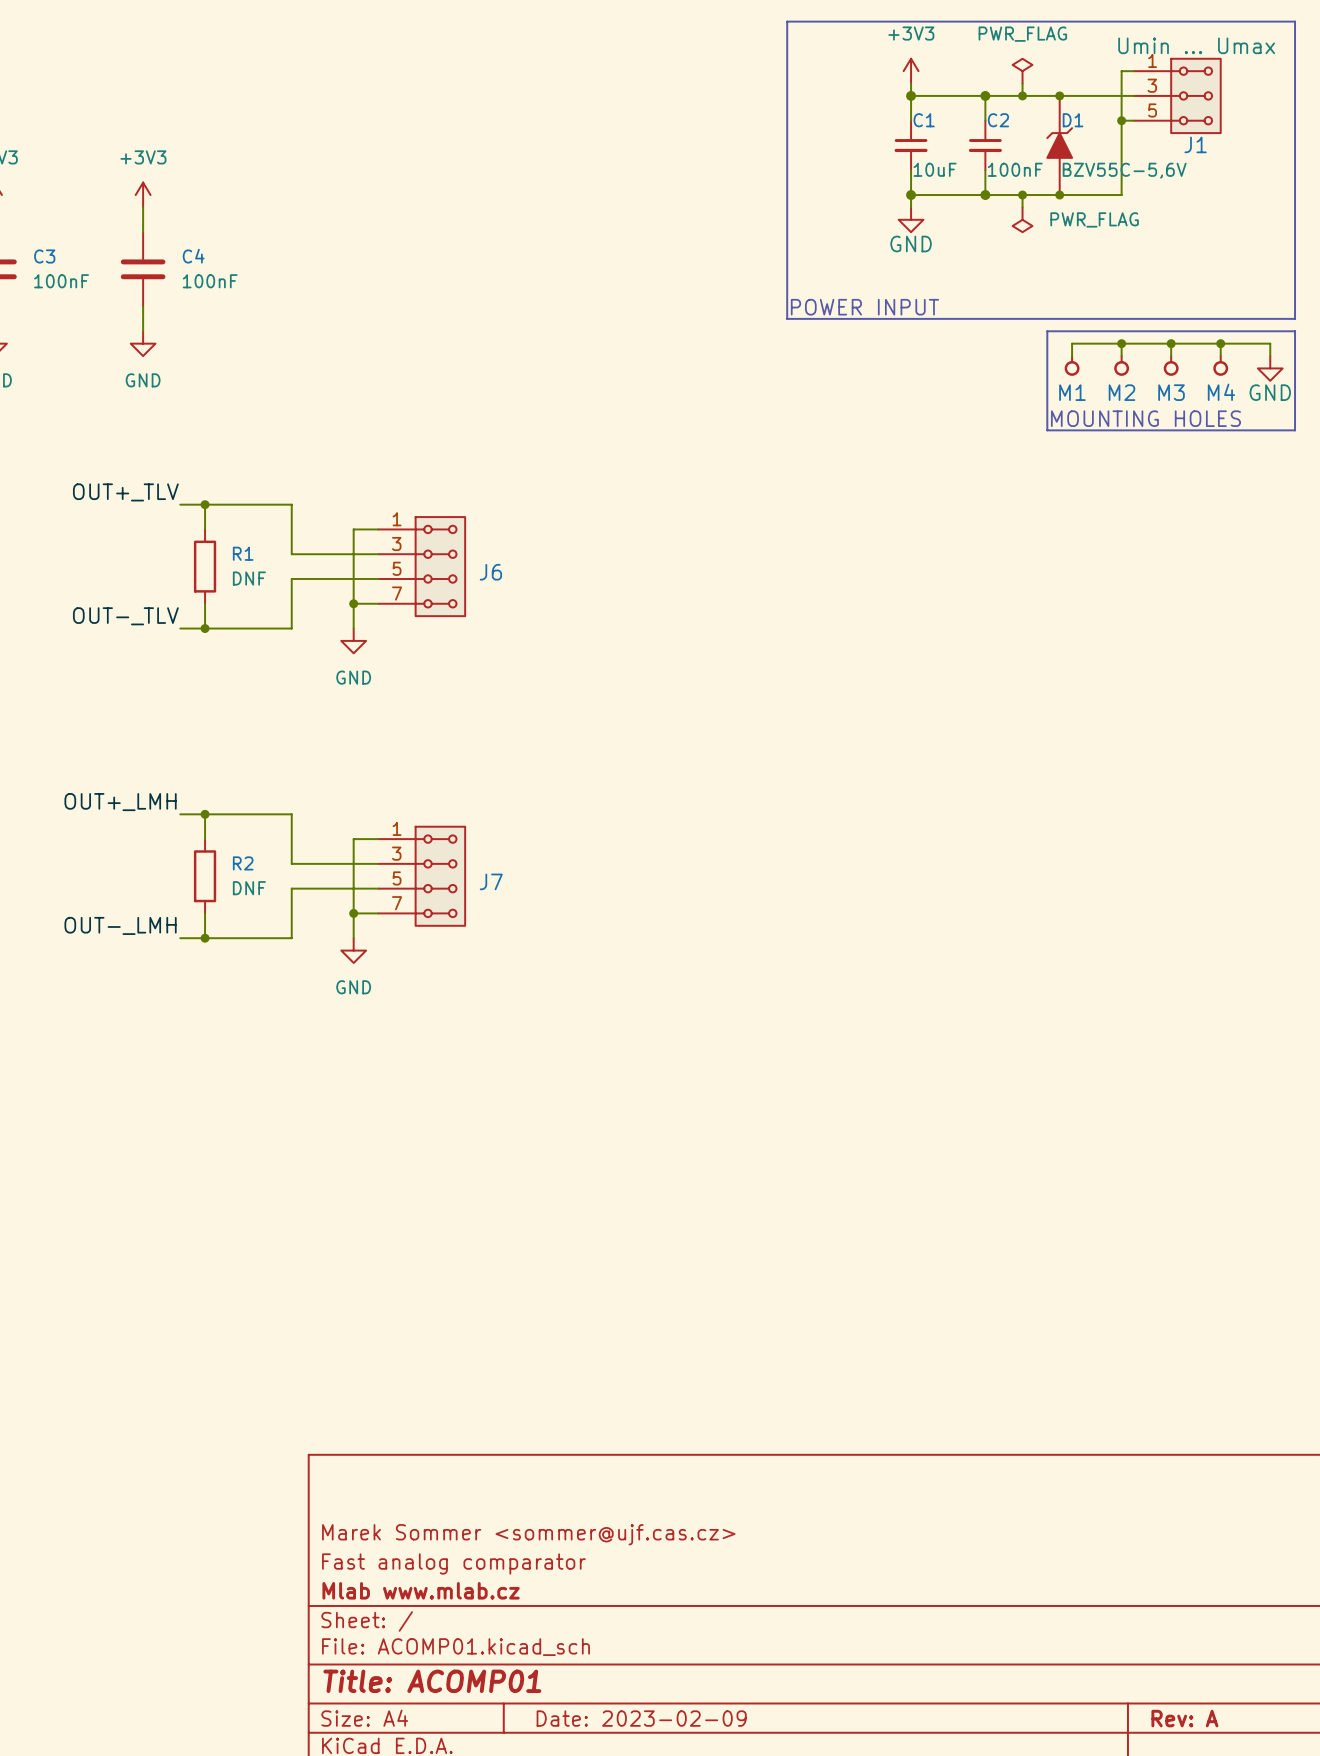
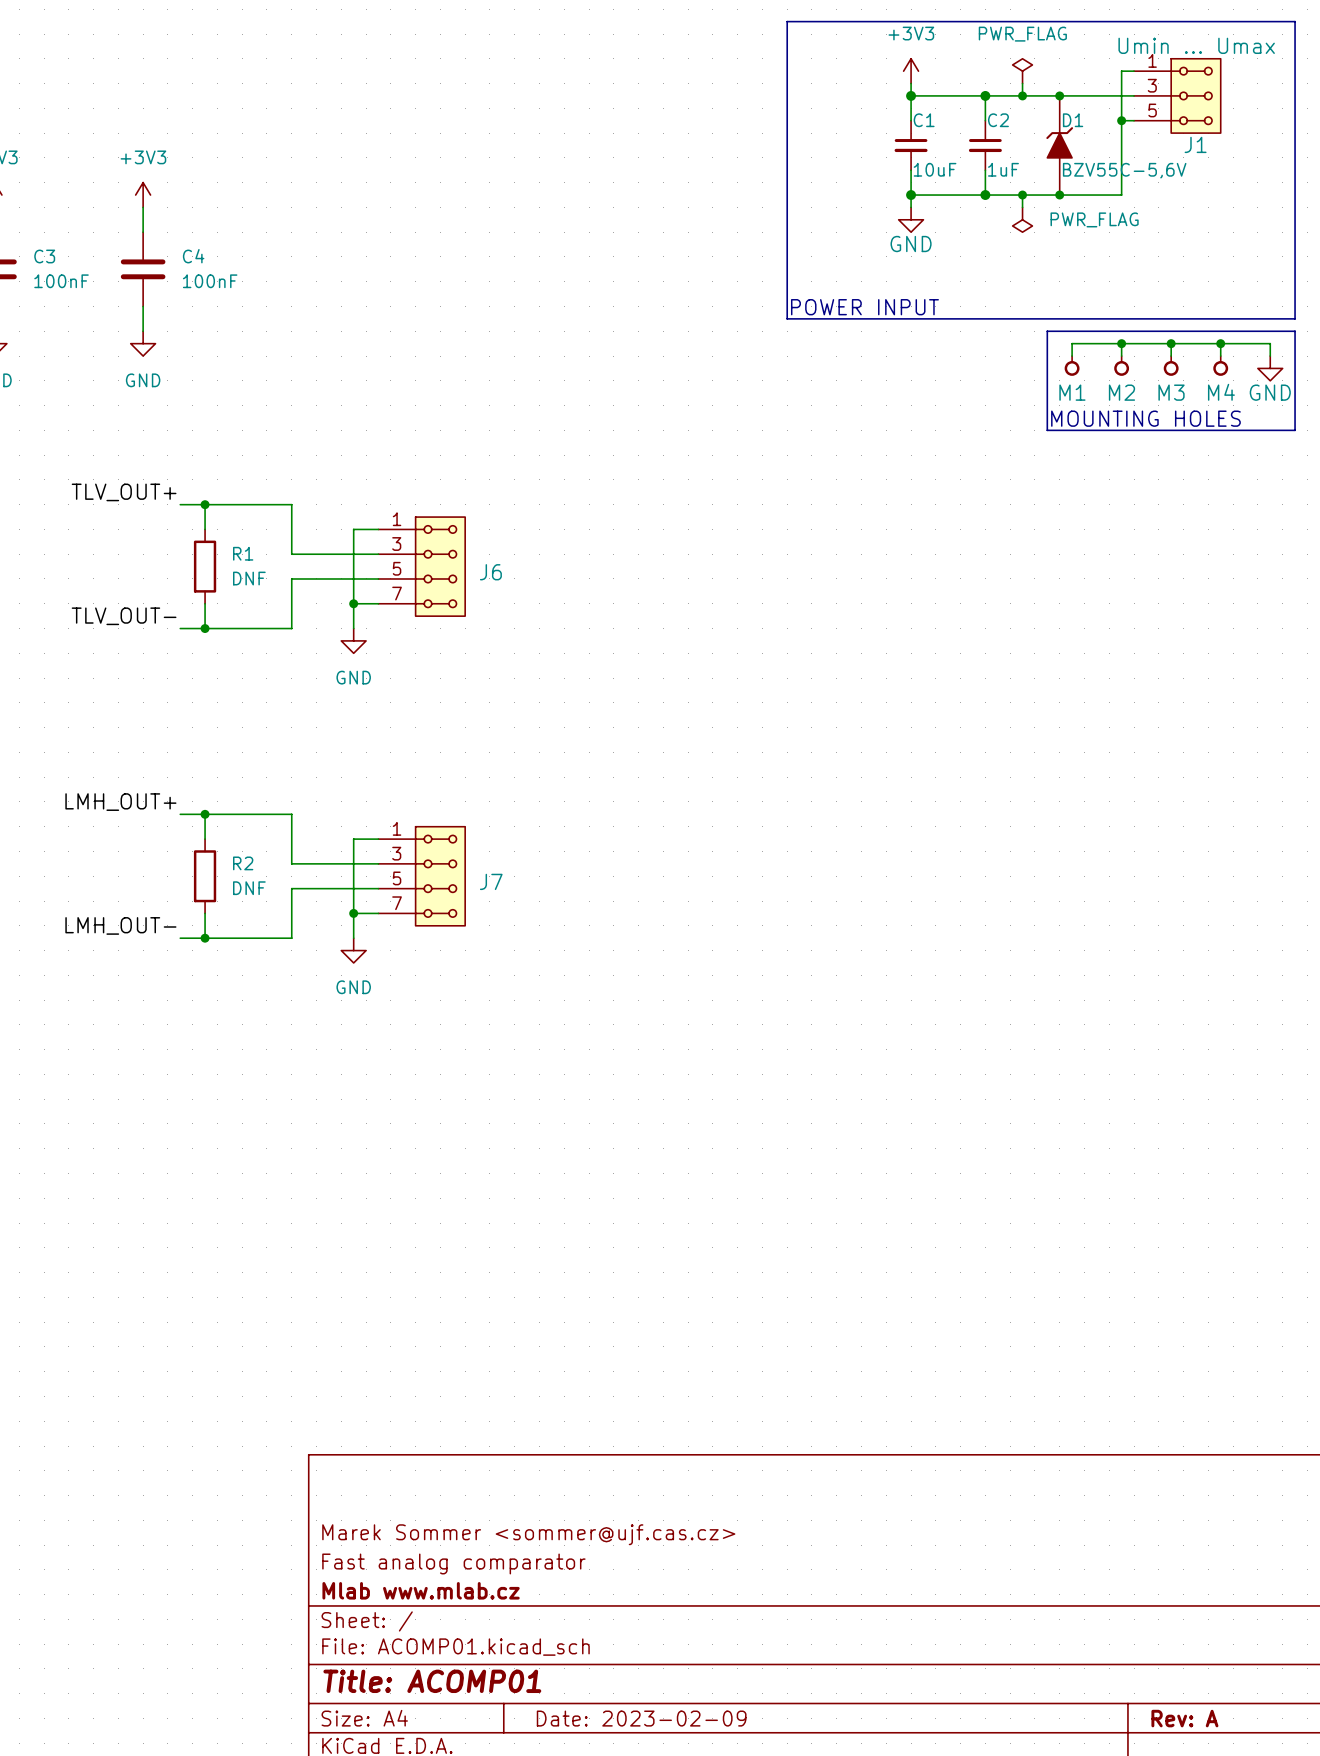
C2 value: 100nF (1015, 169) -> 1uF (1003, 169)
label: OUT+_TLV (125, 492) -> TLV_OUT+ (124, 492)
label: OUT-_TLV (125, 616) -> TLV_OUT- (124, 616)
label: OUT+_LMH (120, 802) -> LMH_OUT+ (120, 802)
label: OUT-_LMH (120, 925) -> LMH_OUT- (120, 925)

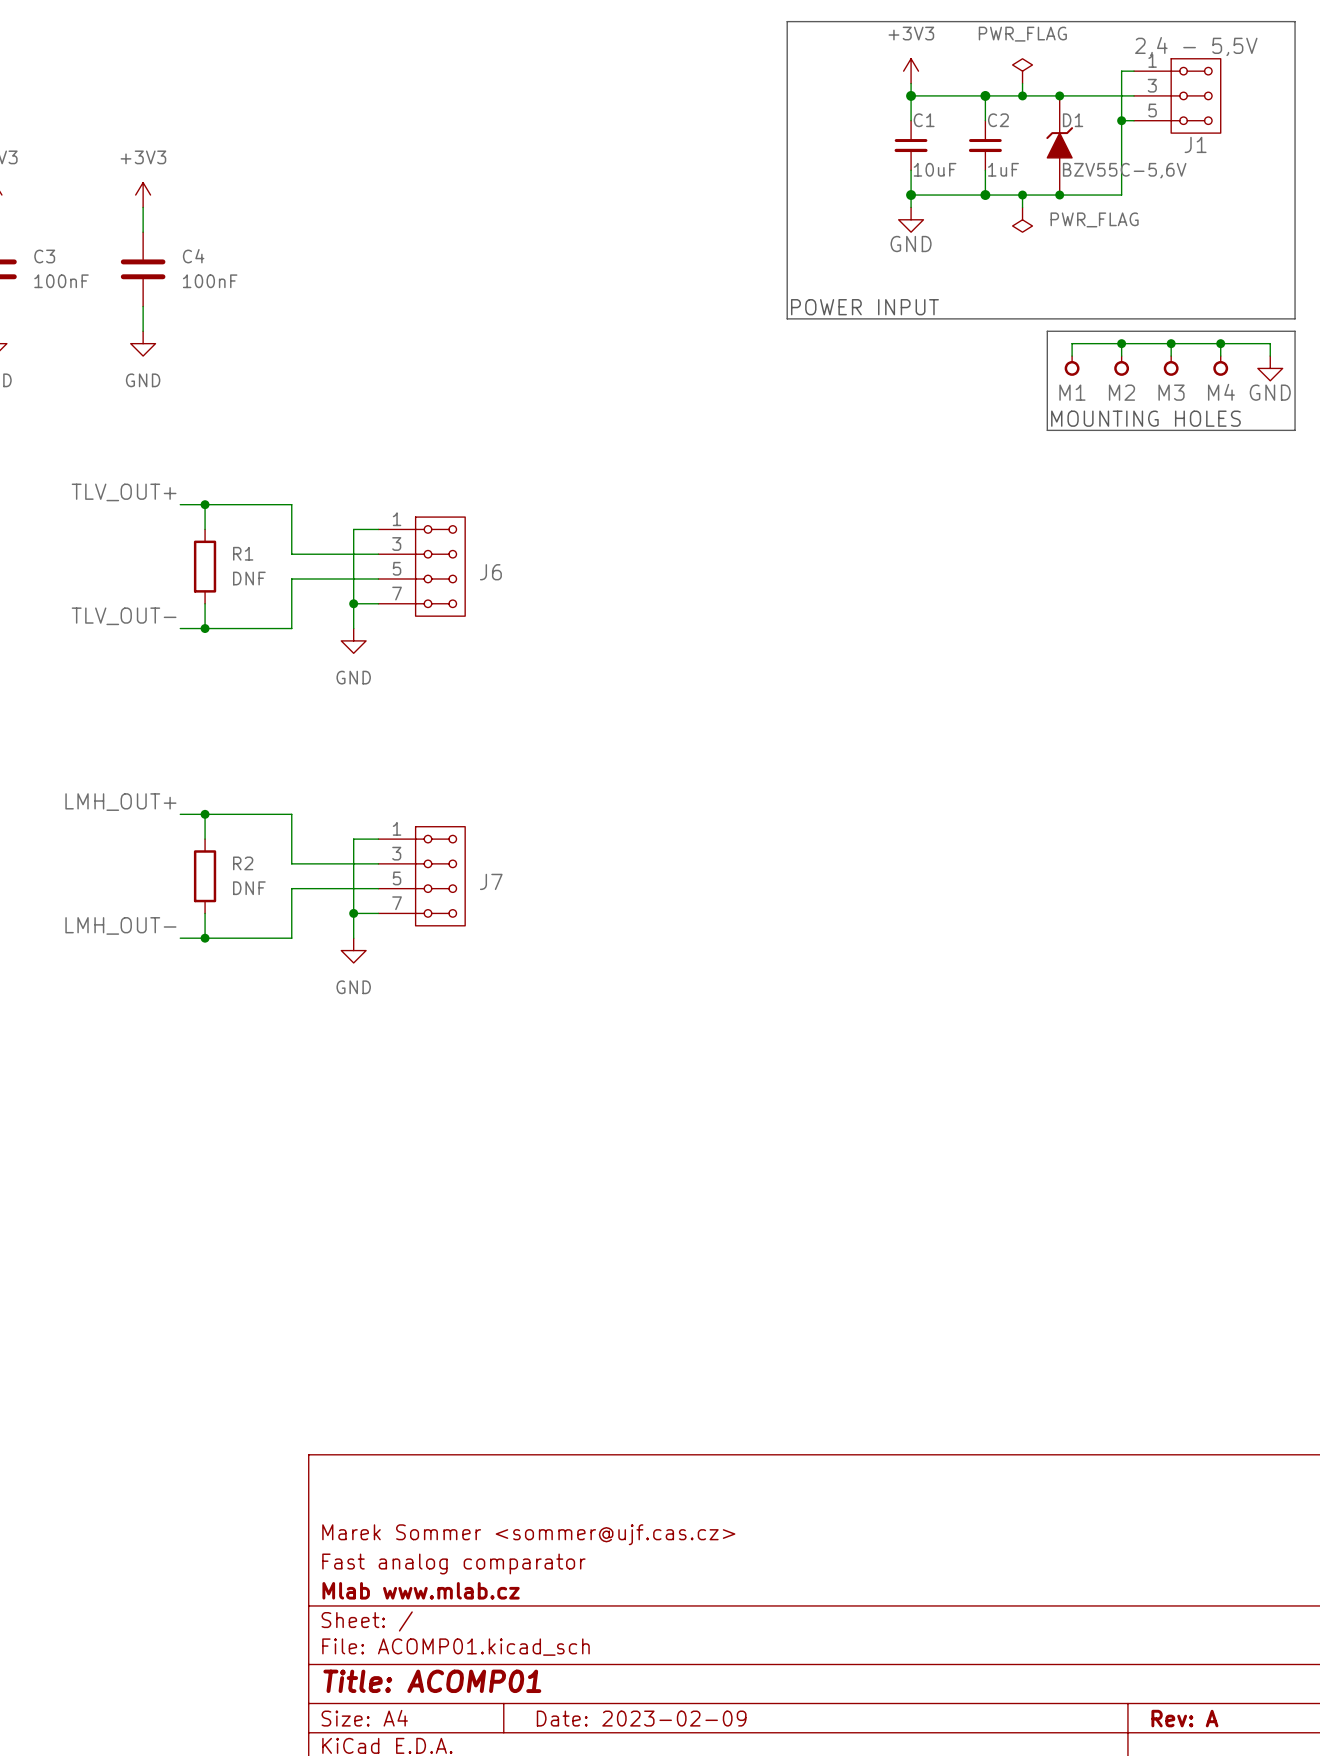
J1 value: Umin ... Umax (1196, 45) -> 2,4 - 5,5V (1196, 46)

